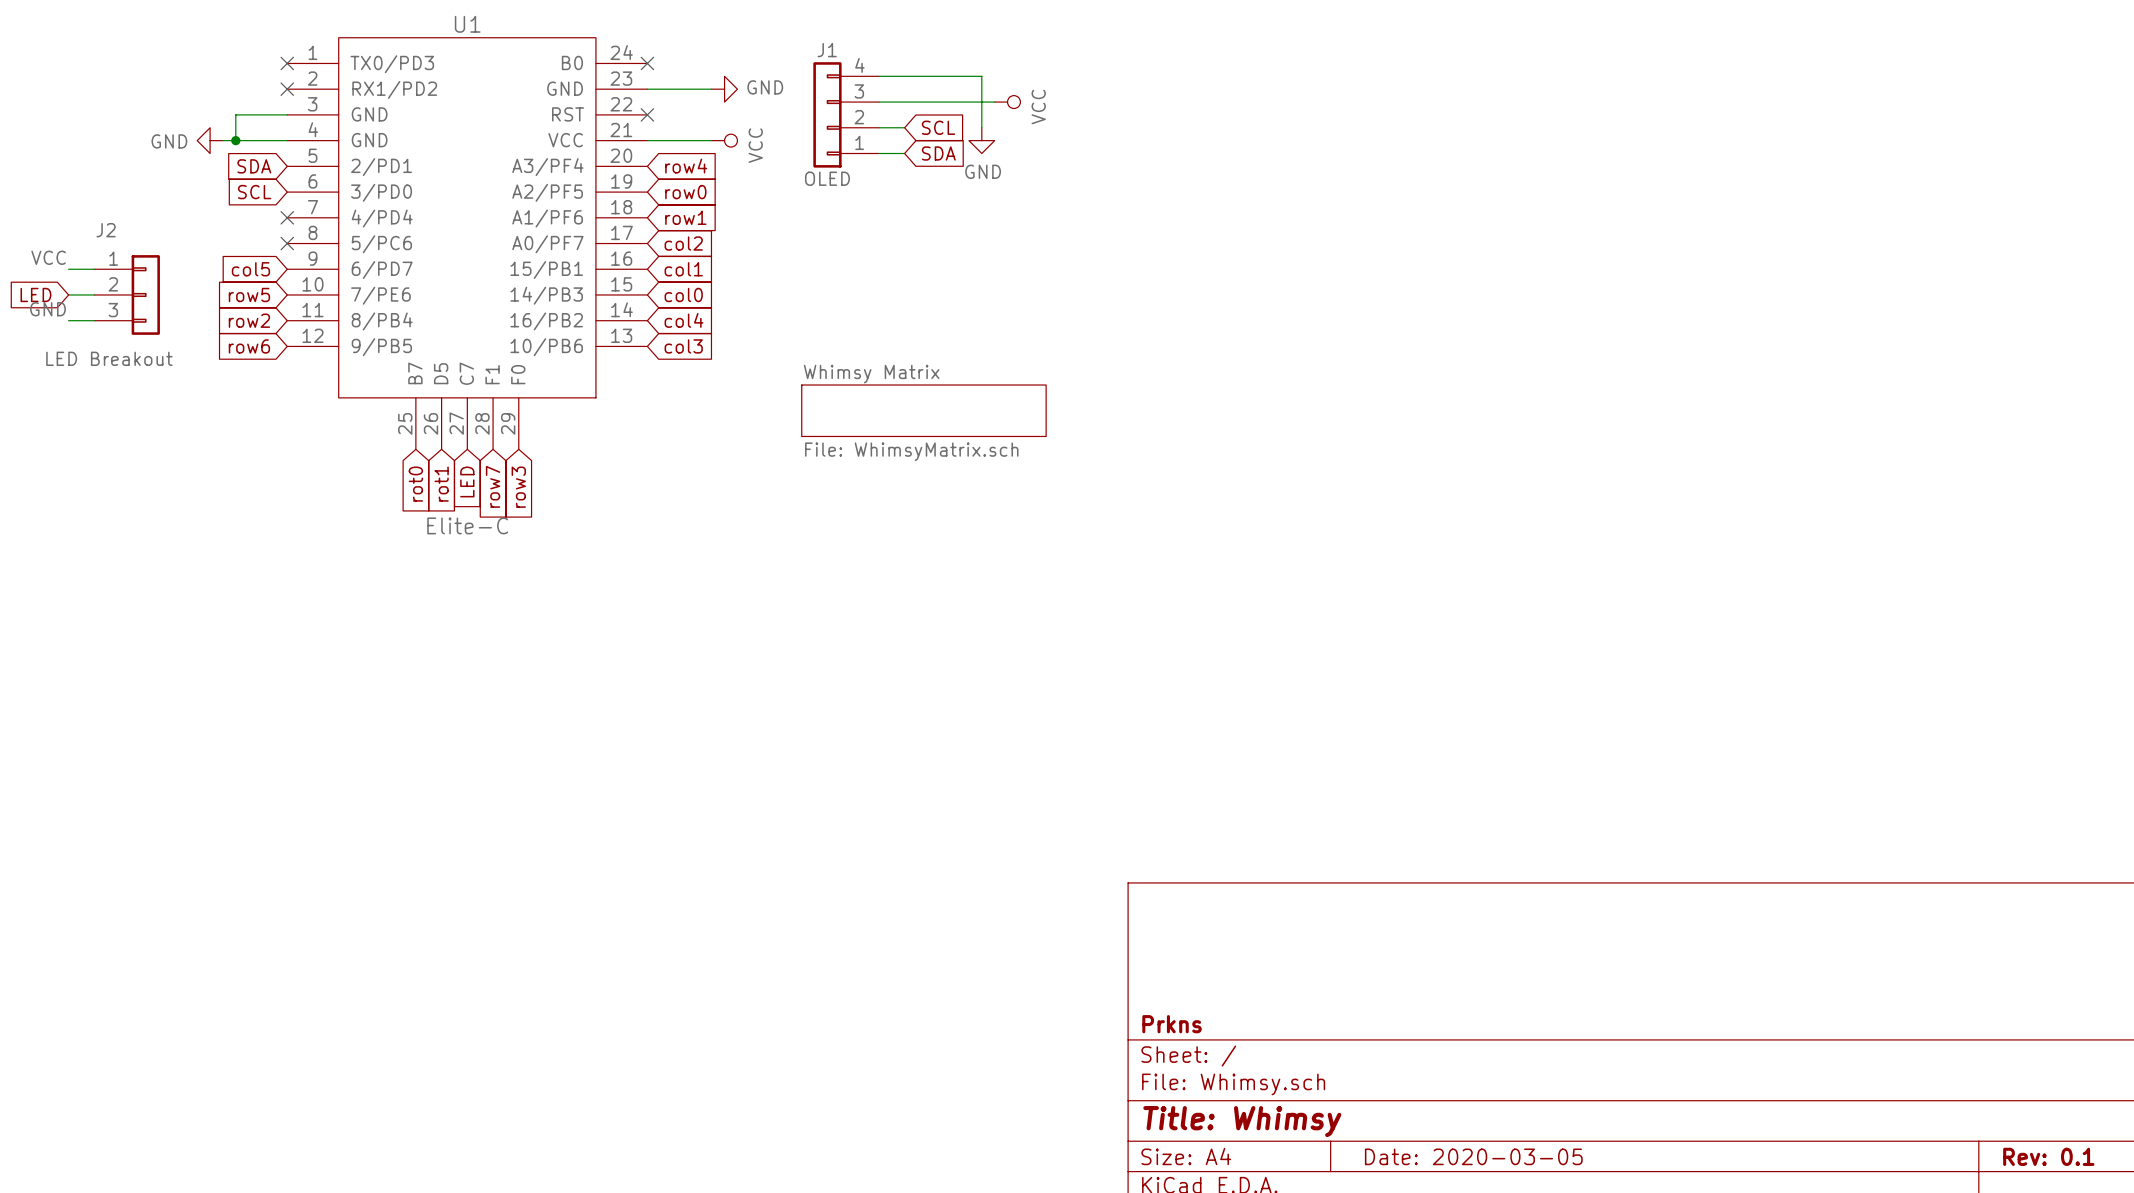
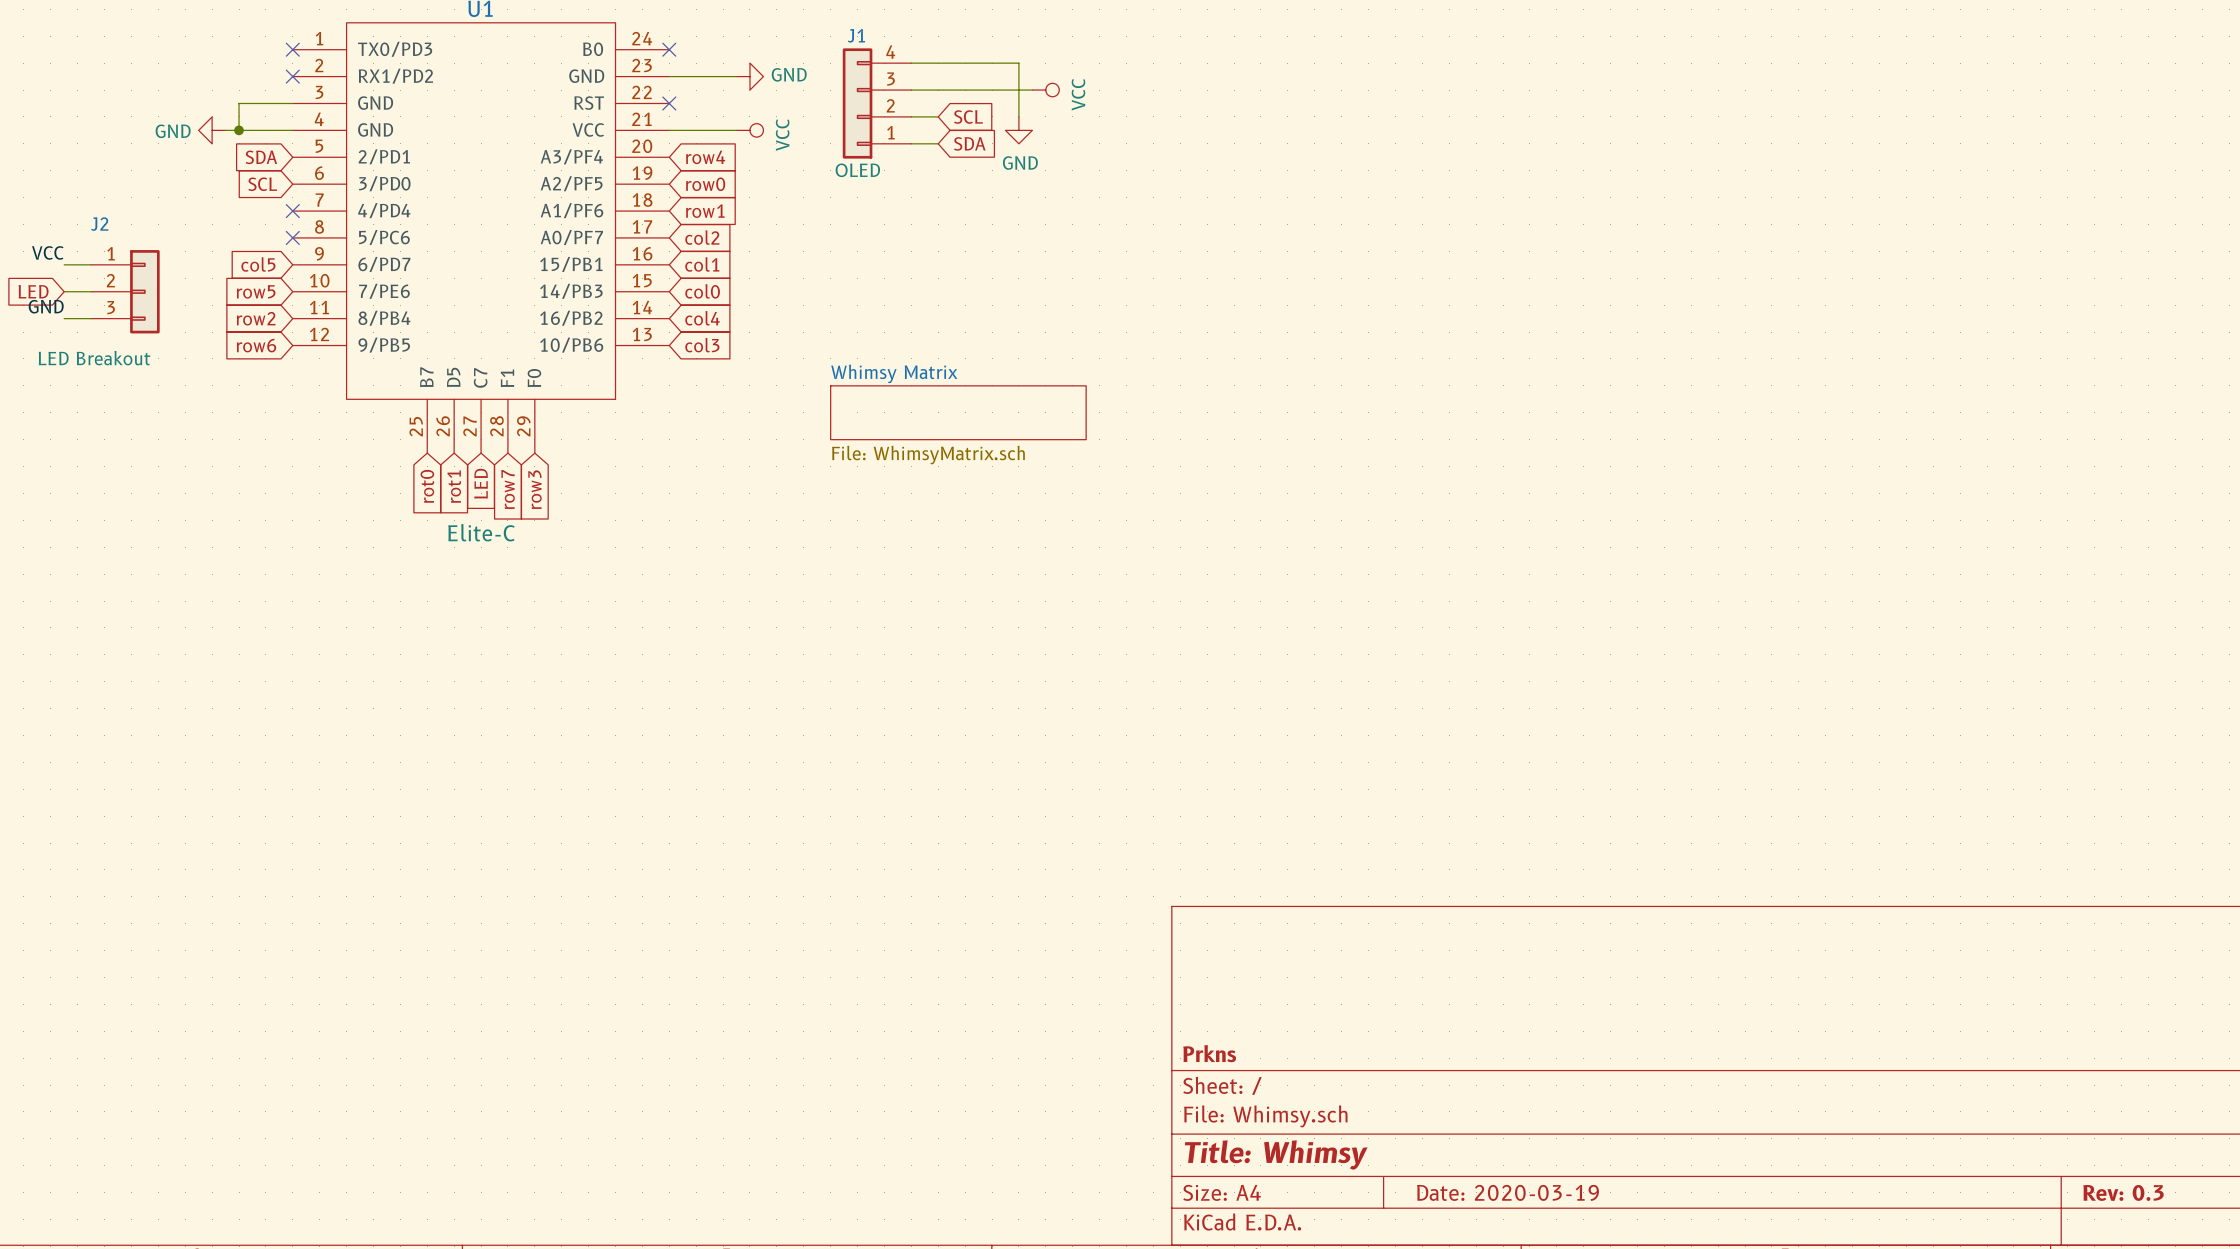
title block: Date: 2020-03-05 (1473, 1156) -> Date: 2020-03-19 (1508, 1192)
title block: Rev: 0.1 (2048, 1156) -> Rev: 0.3 (2123, 1192)

